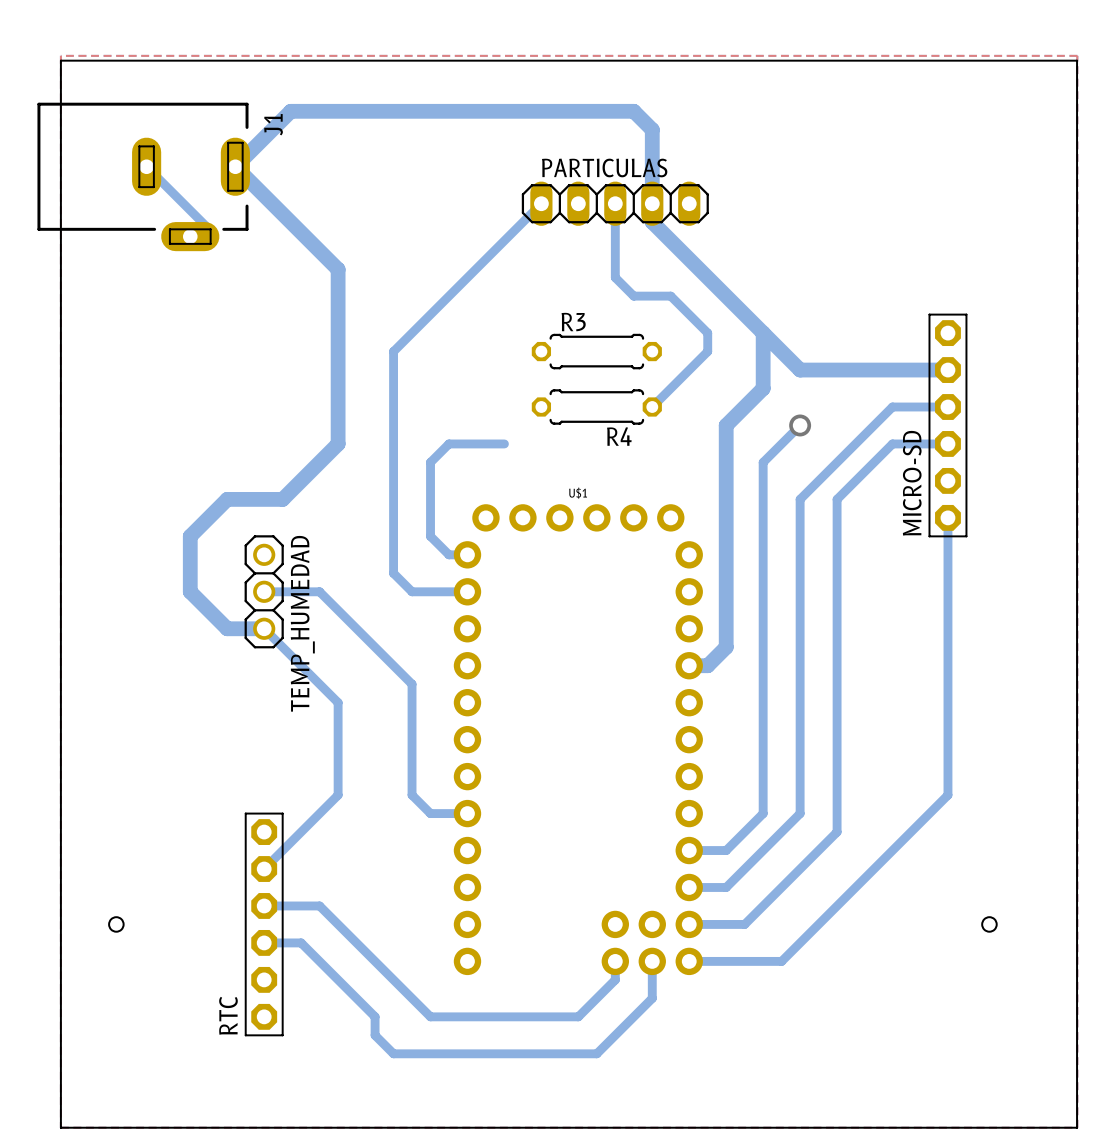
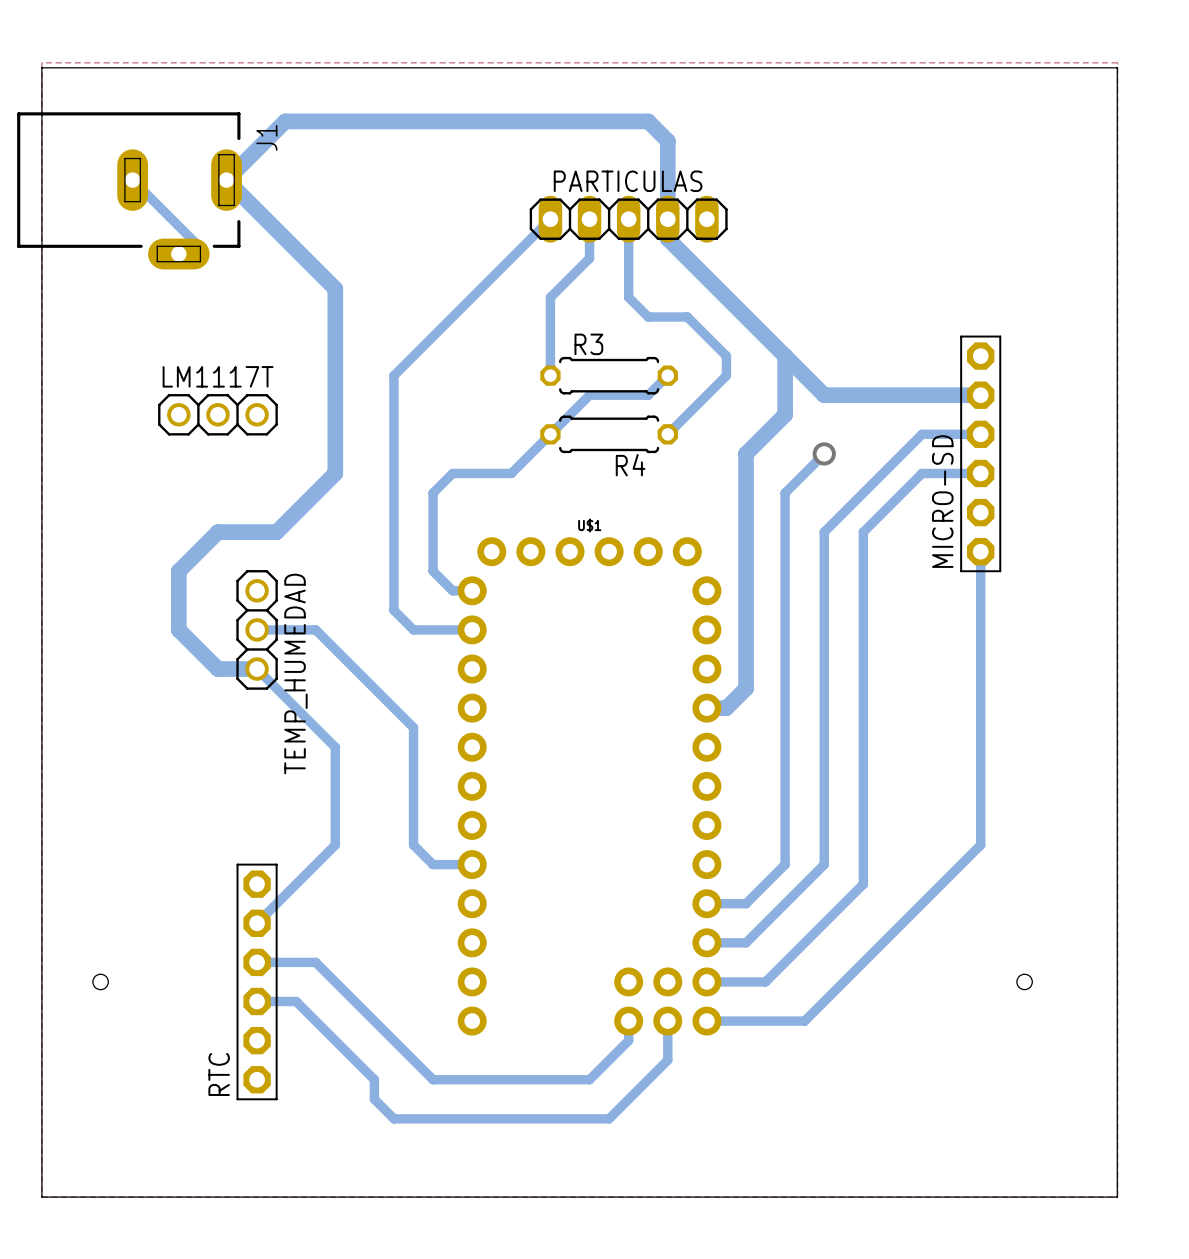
bottom track: none -> (589, 219) (589, 258) (550, 297) (550, 375)
bottom track: none -> (667, 375) (648, 395) (589, 395) (511, 473)
LM1117T: none -> (217, 414)

